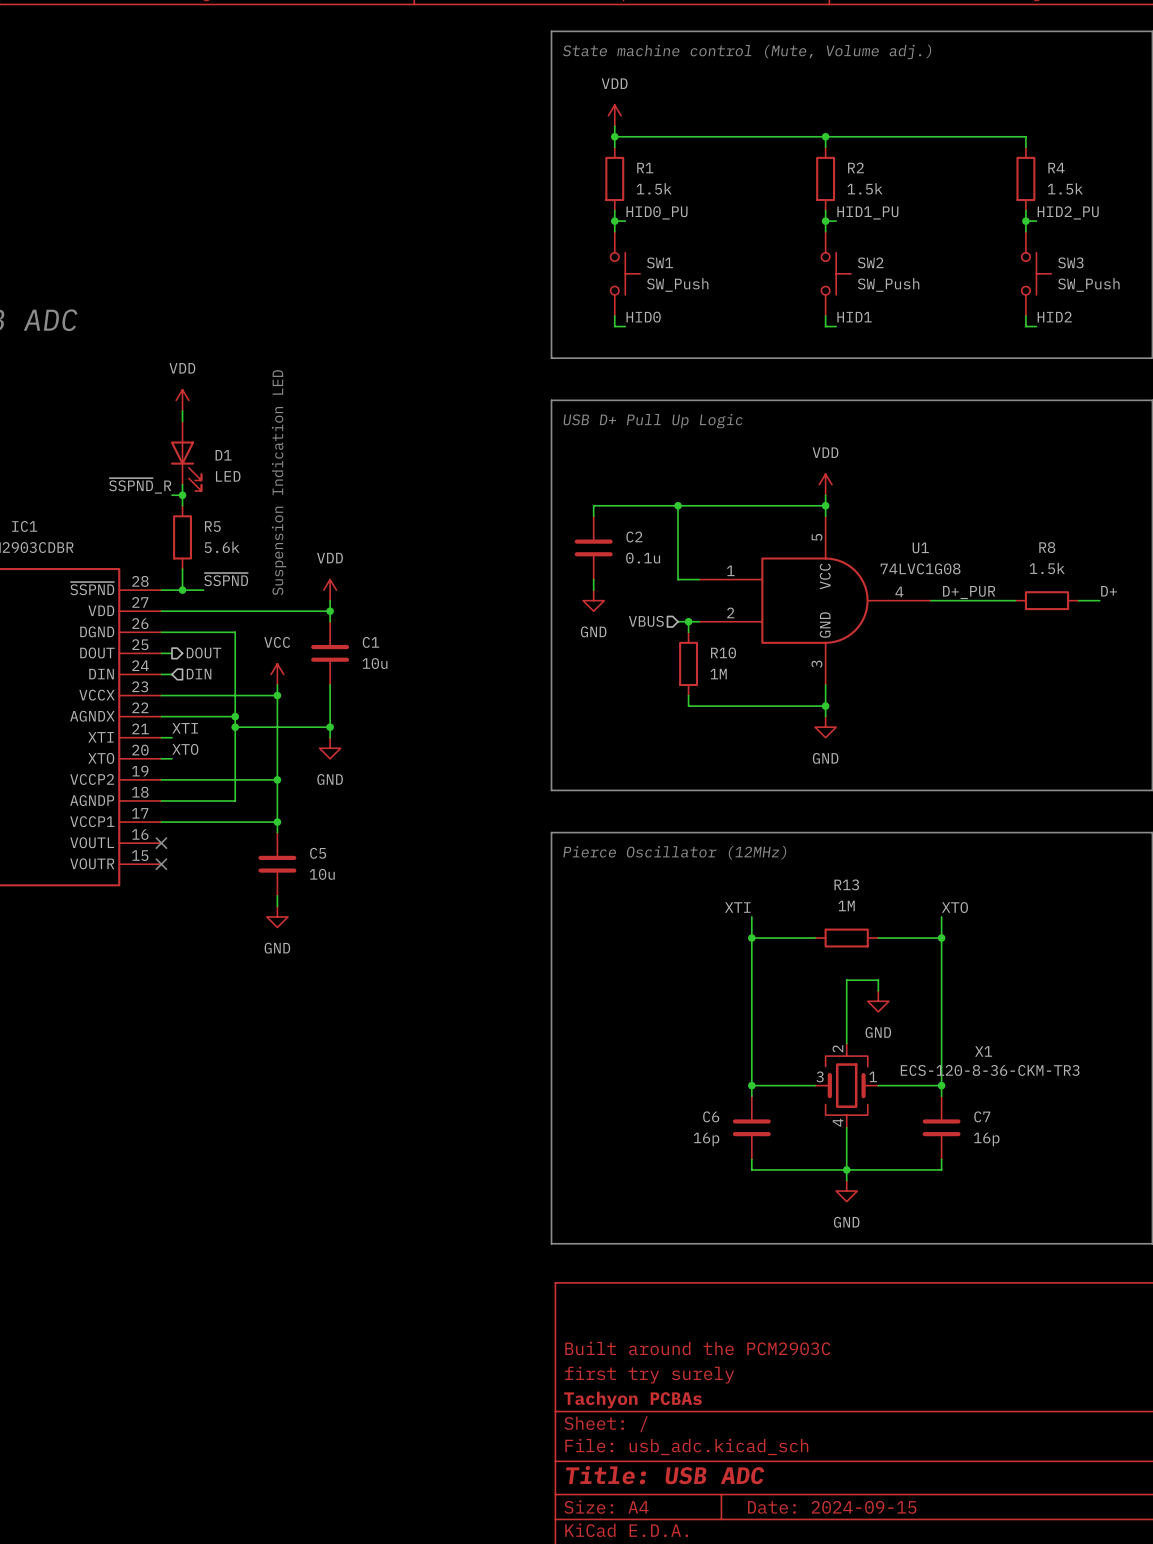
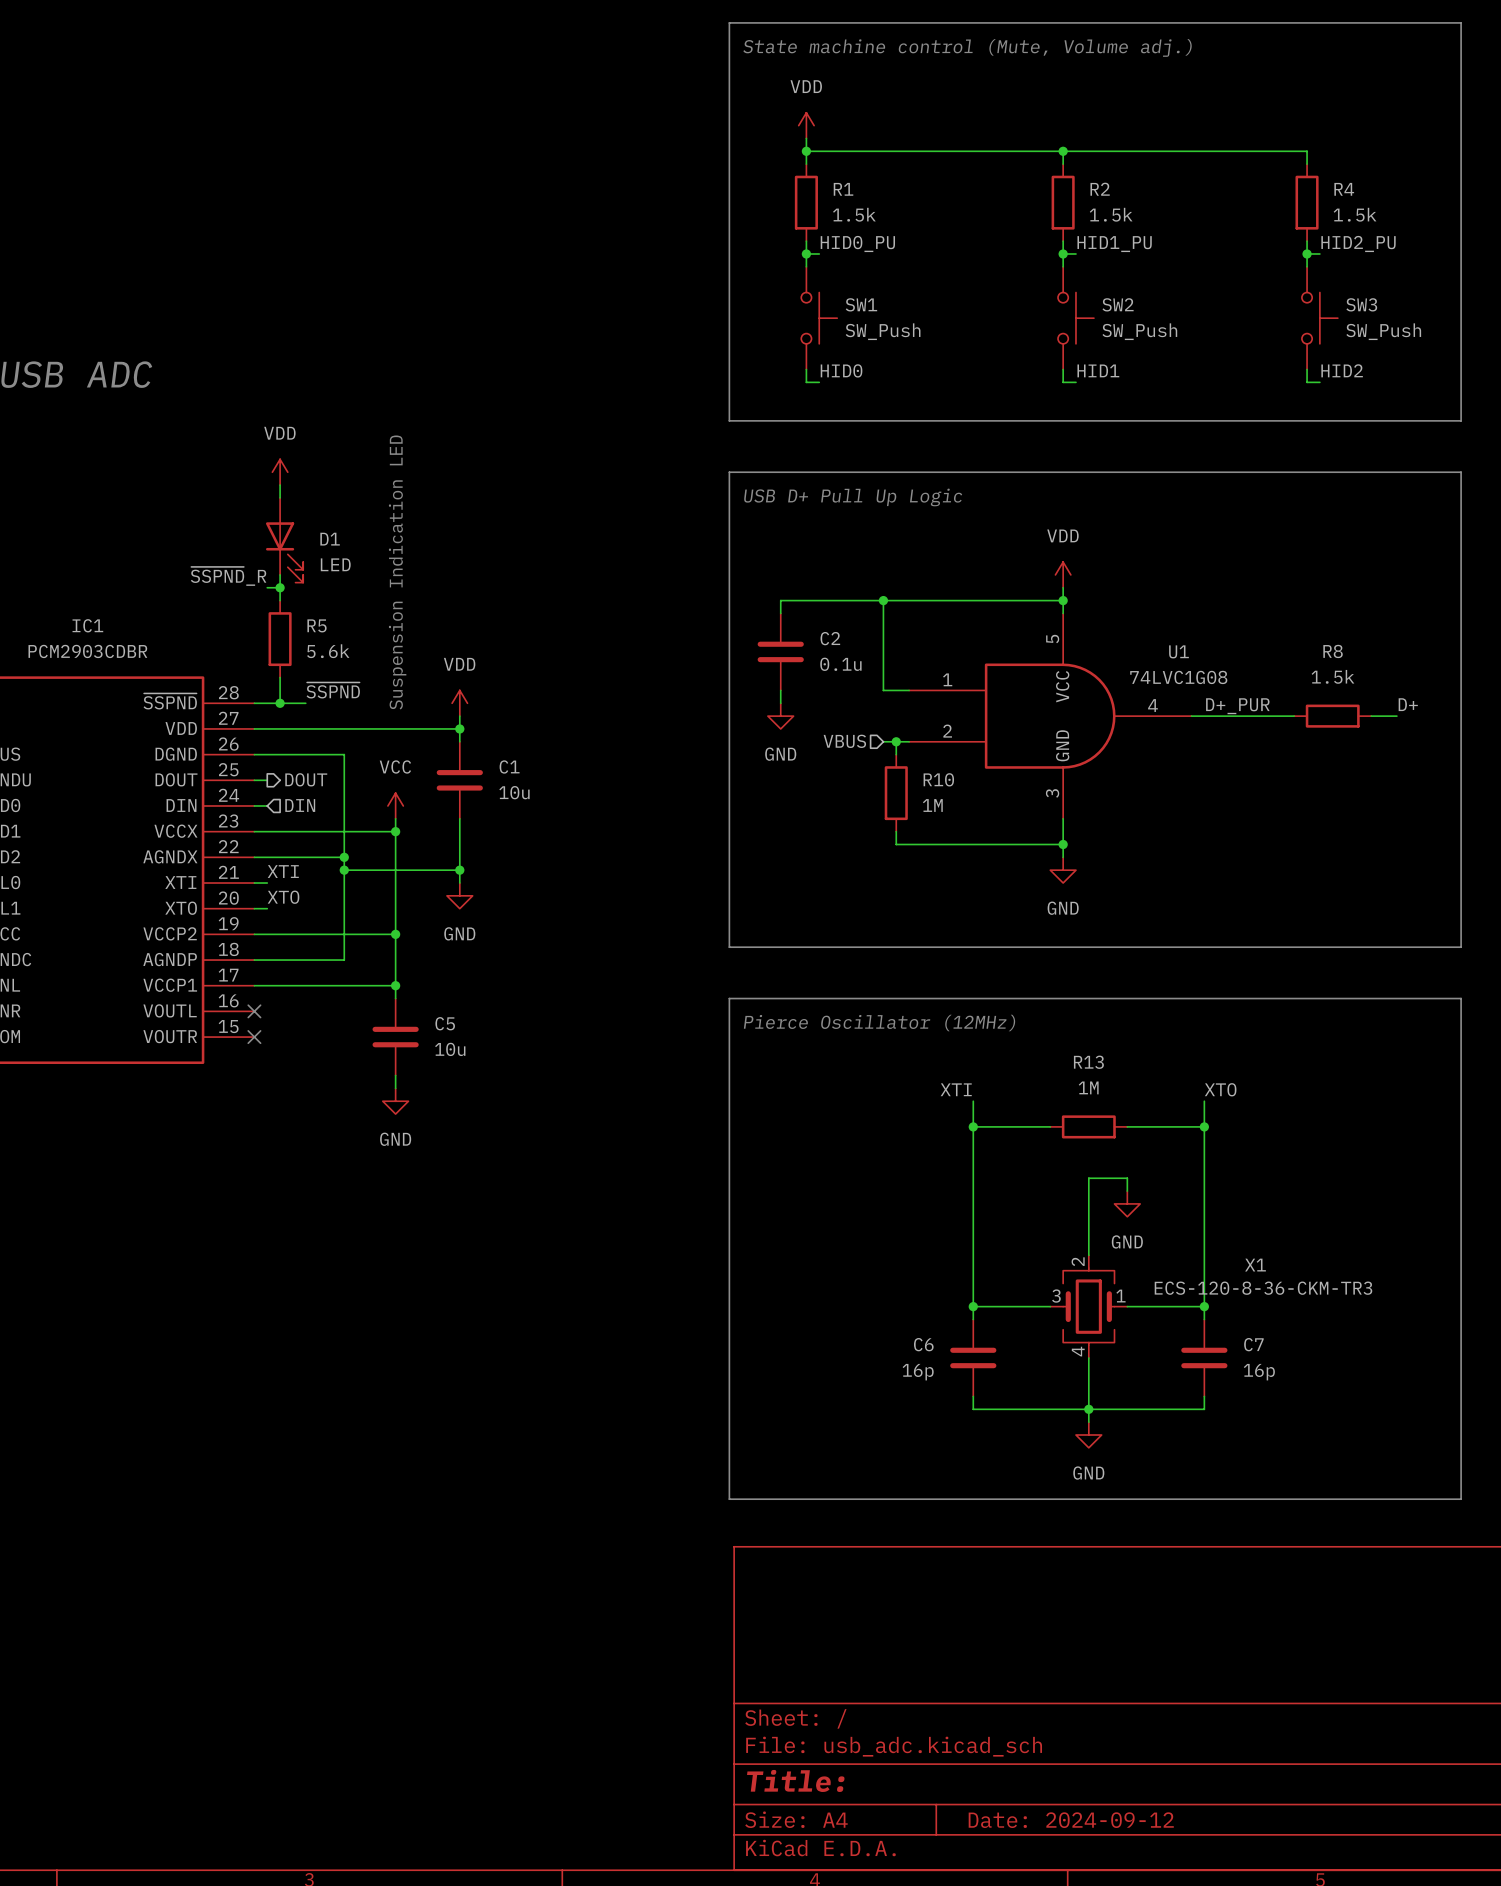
title block: Built around the PCM2903C (697, 1348) -> none
title block: first try surely (649, 1375) -> none
title block: Tachyon PCBAs (632, 1400) -> none
title block: Title: USB ADC (665, 1475) -> Title: (795, 1780)
title block: Date: 2024-09-15 (832, 1507) -> Date: 2024-09-12 (1071, 1820)

